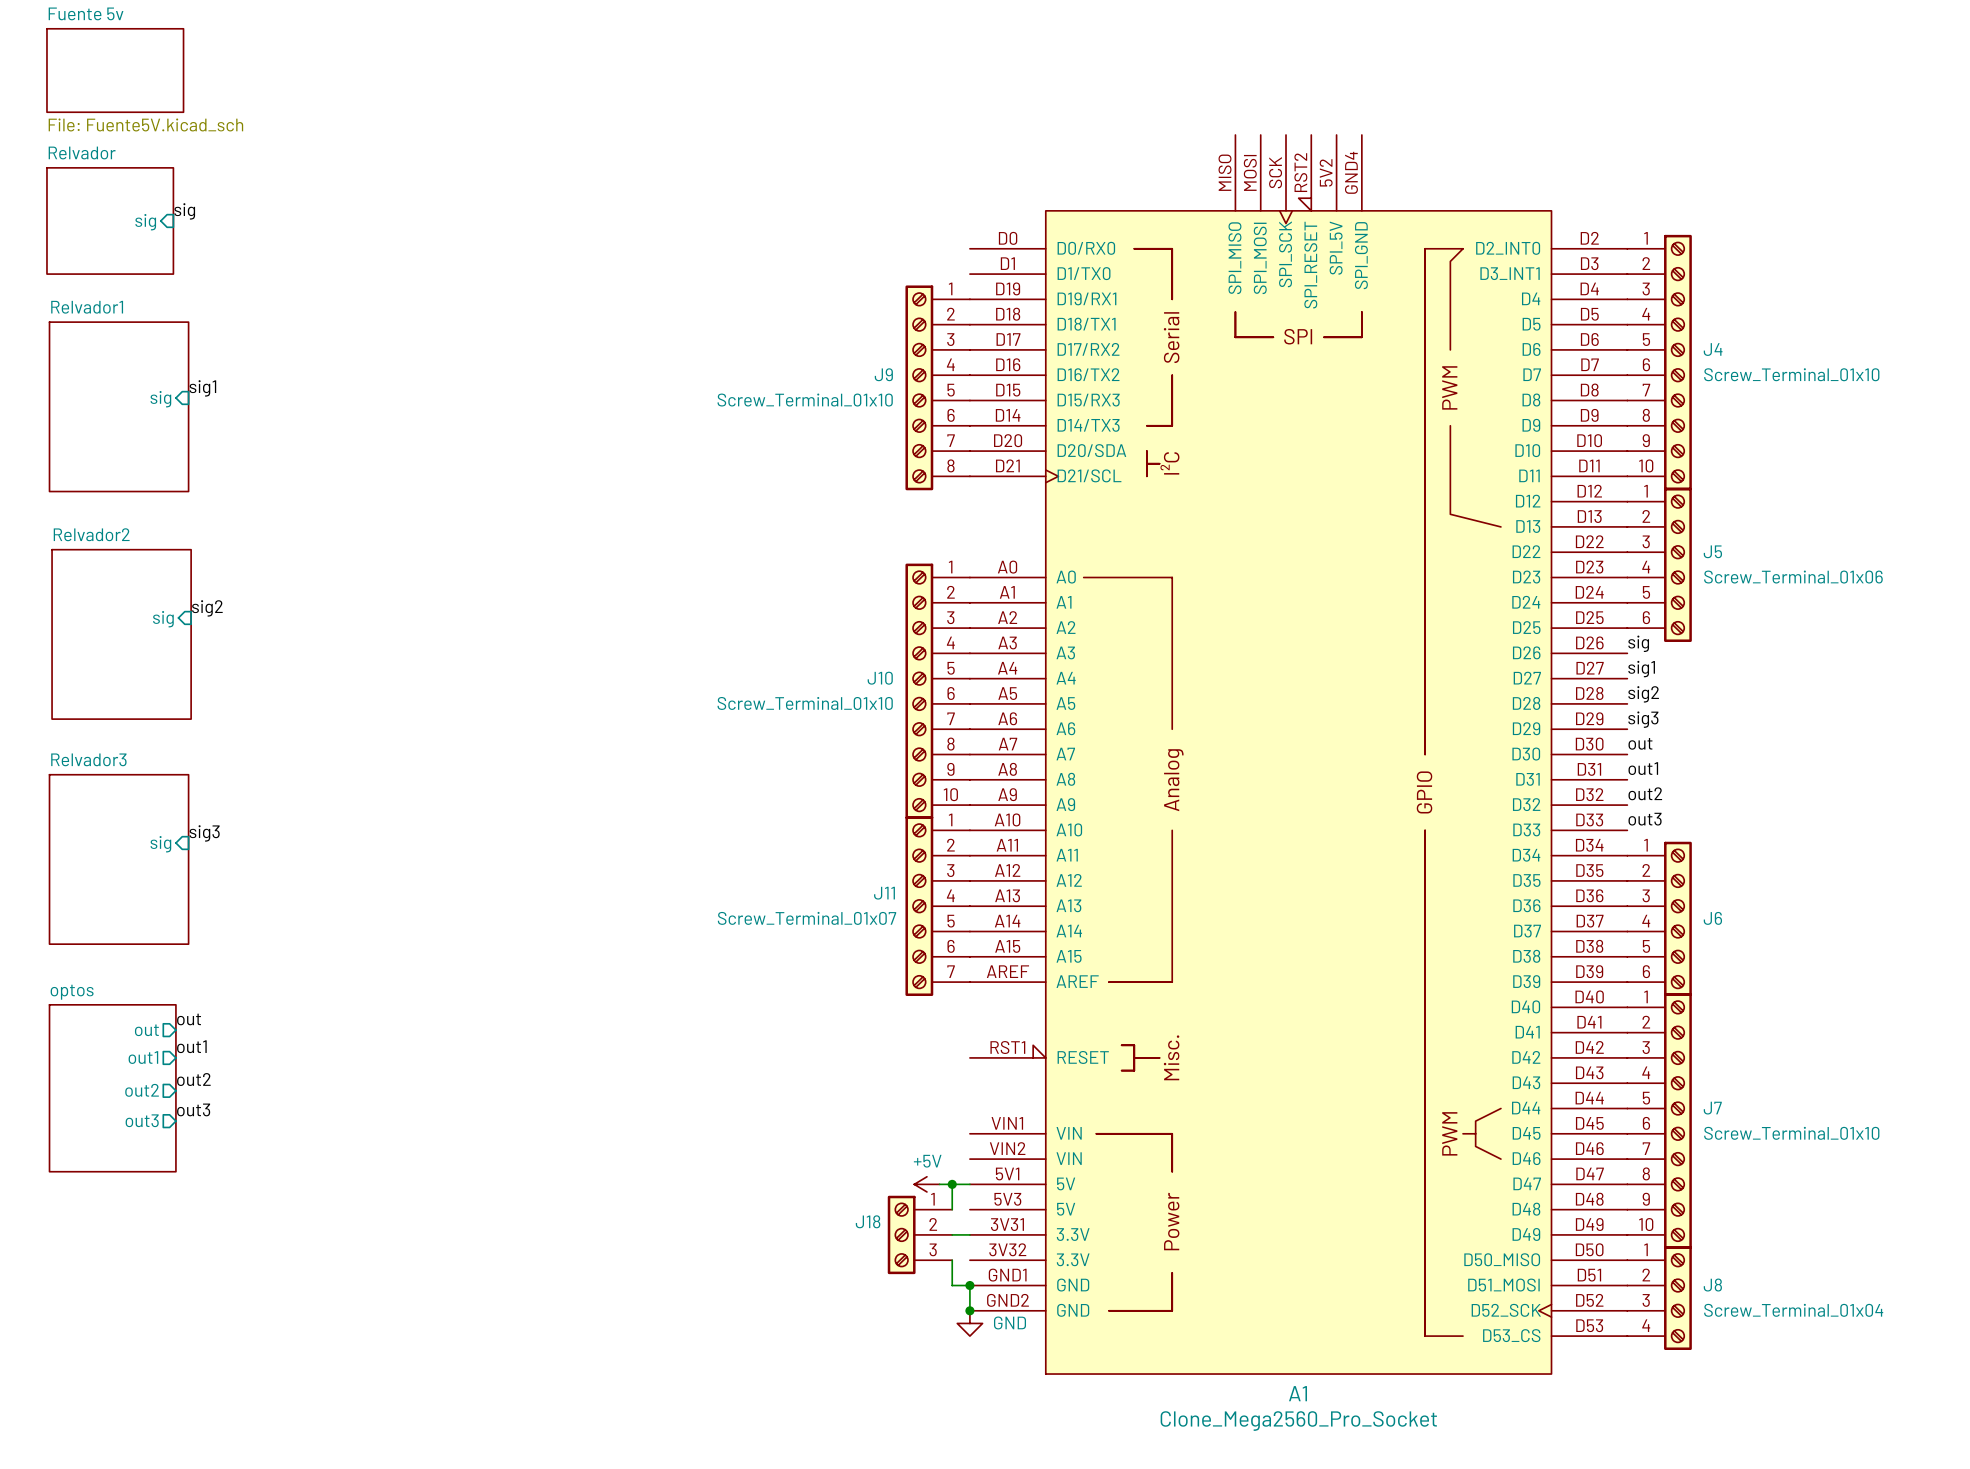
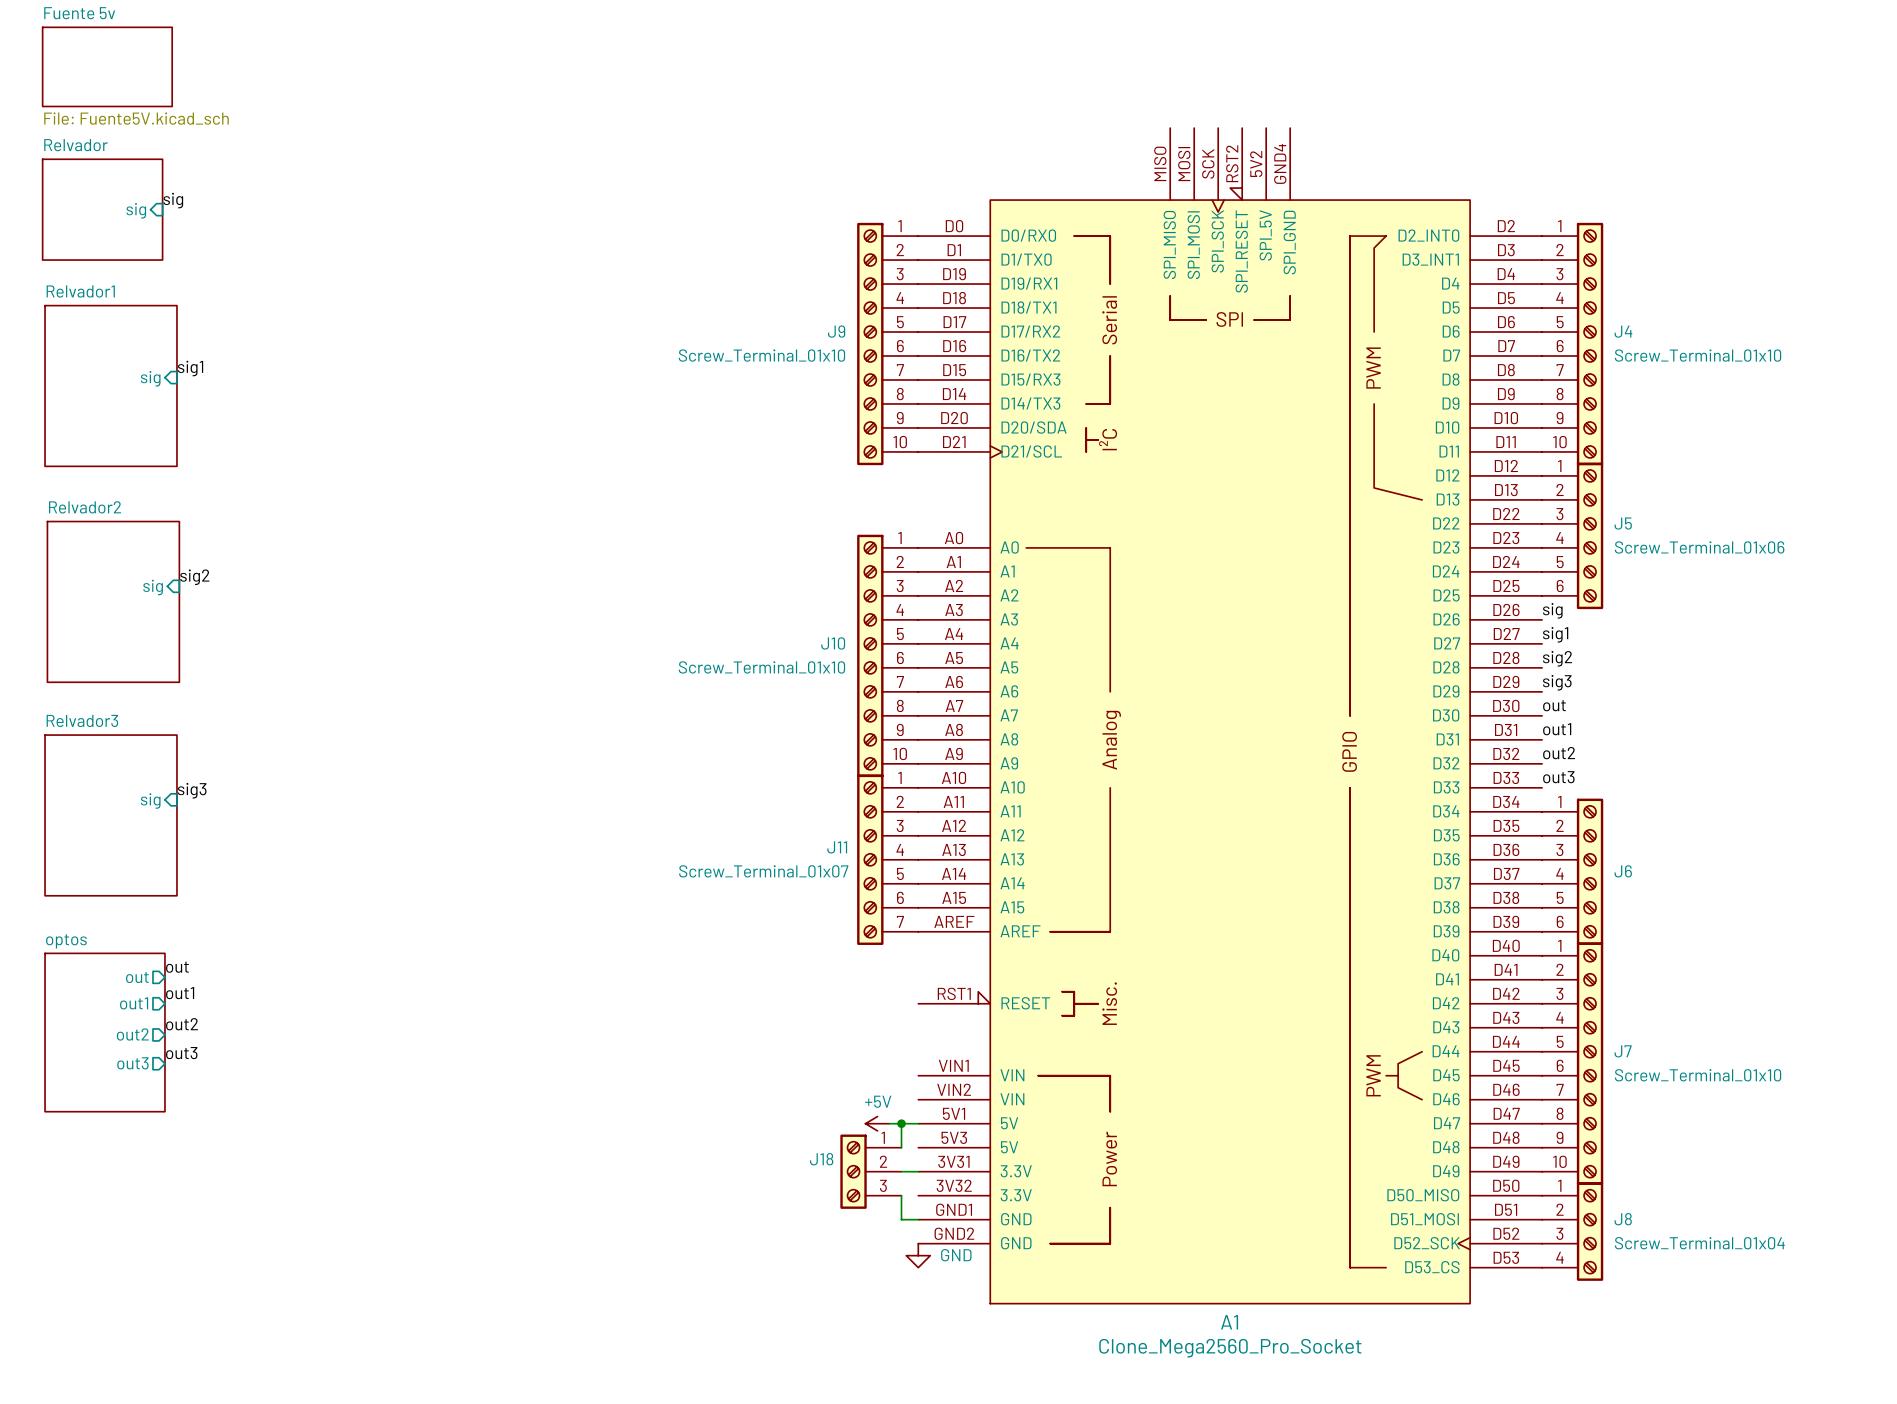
J9 symbol: [905, 285, 970, 491] -> [857, 222, 919, 466]
wire: (969, 1285) (969, 1310) -> none
junction: (969, 1285) -> none
junction: (969, 1310) -> none

